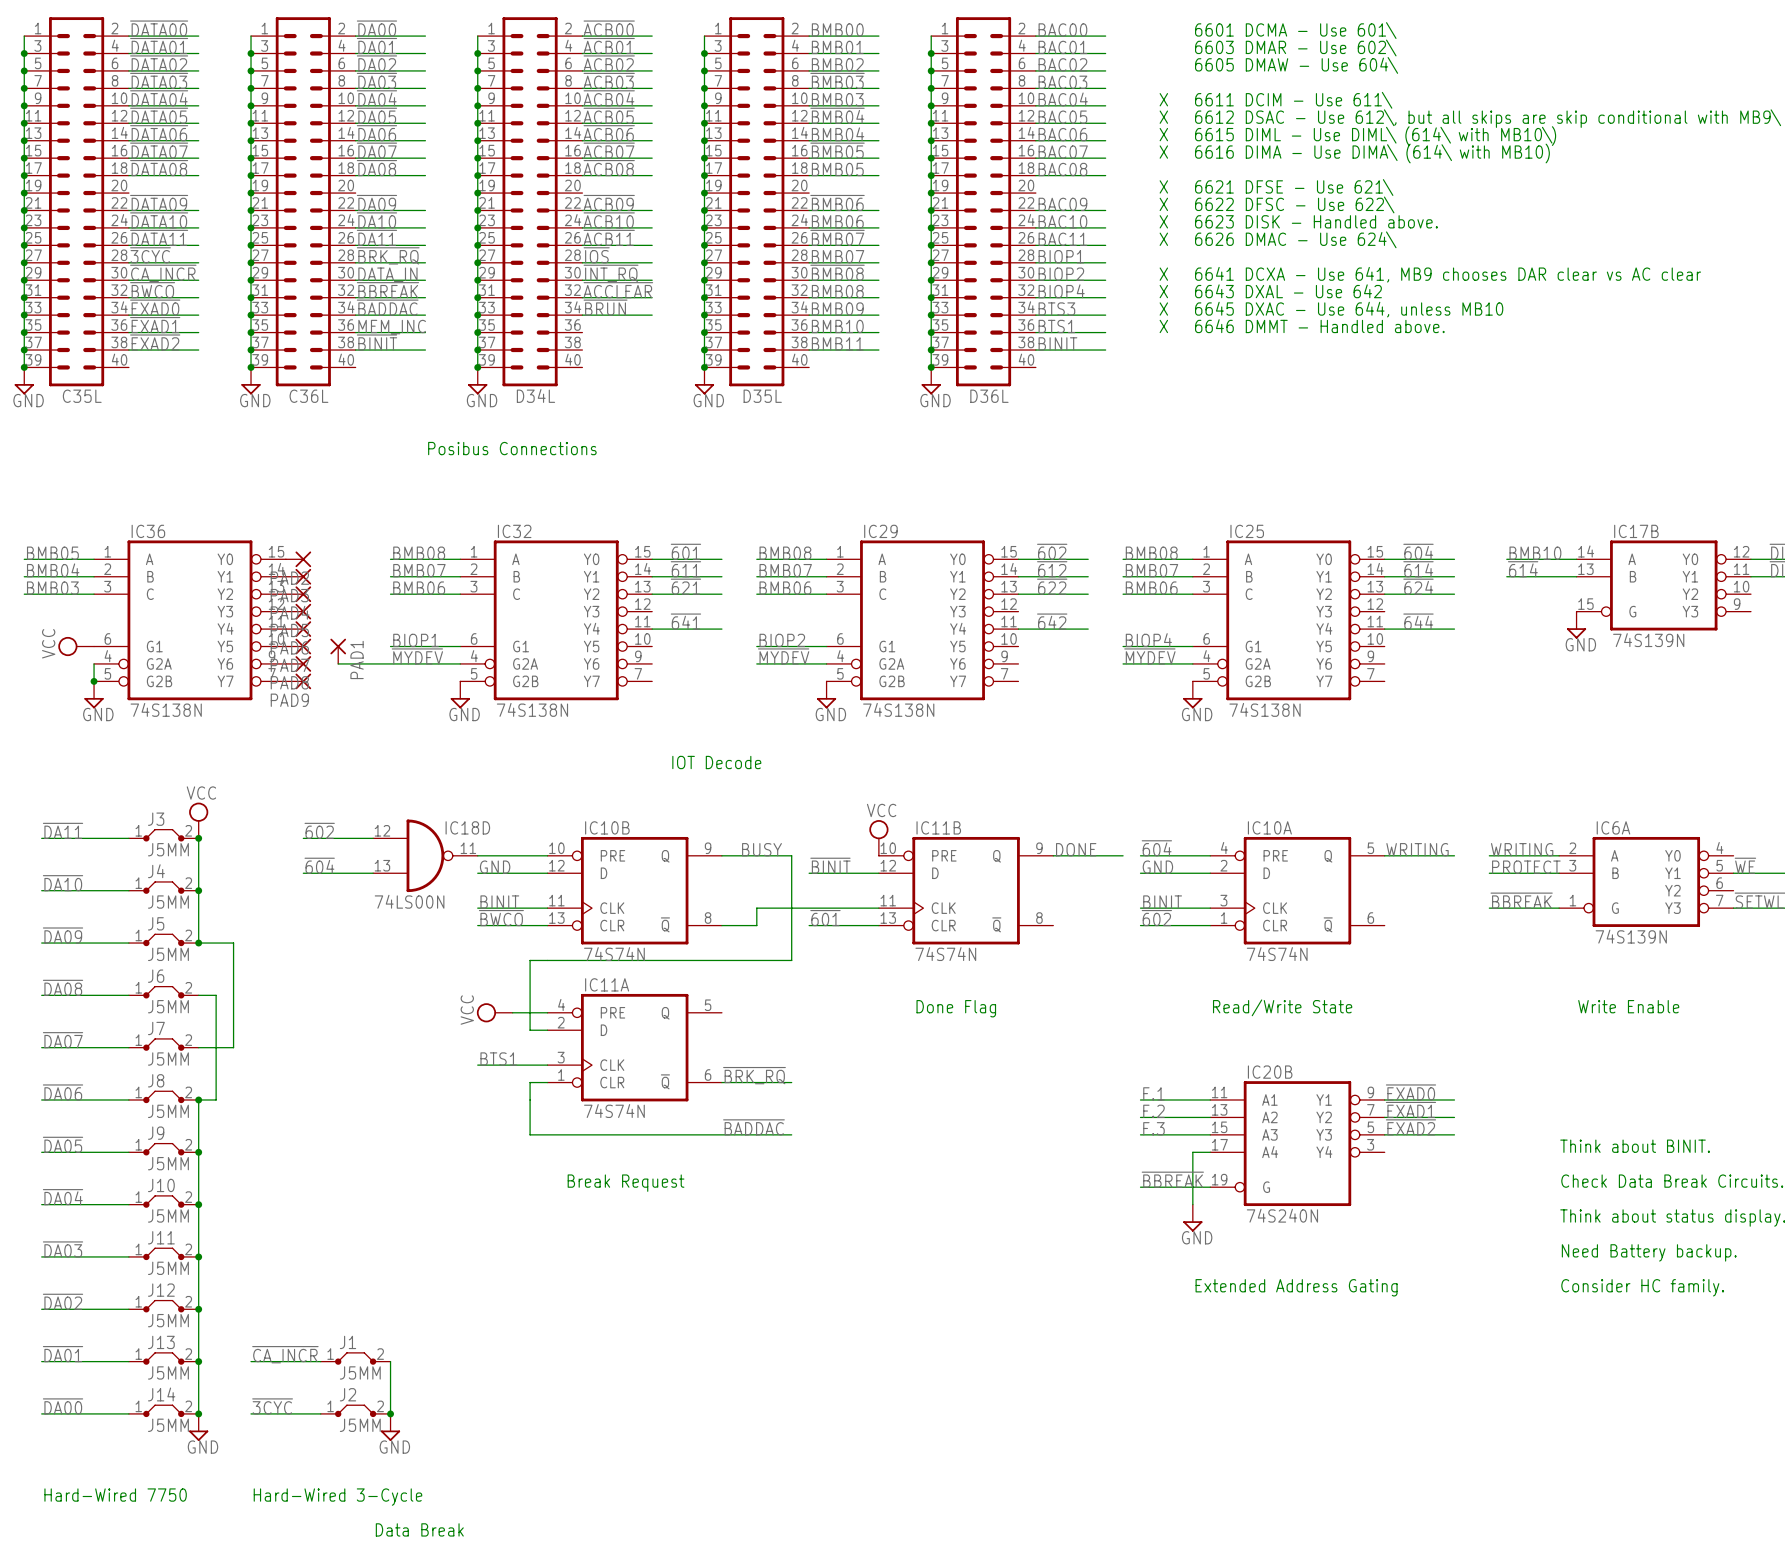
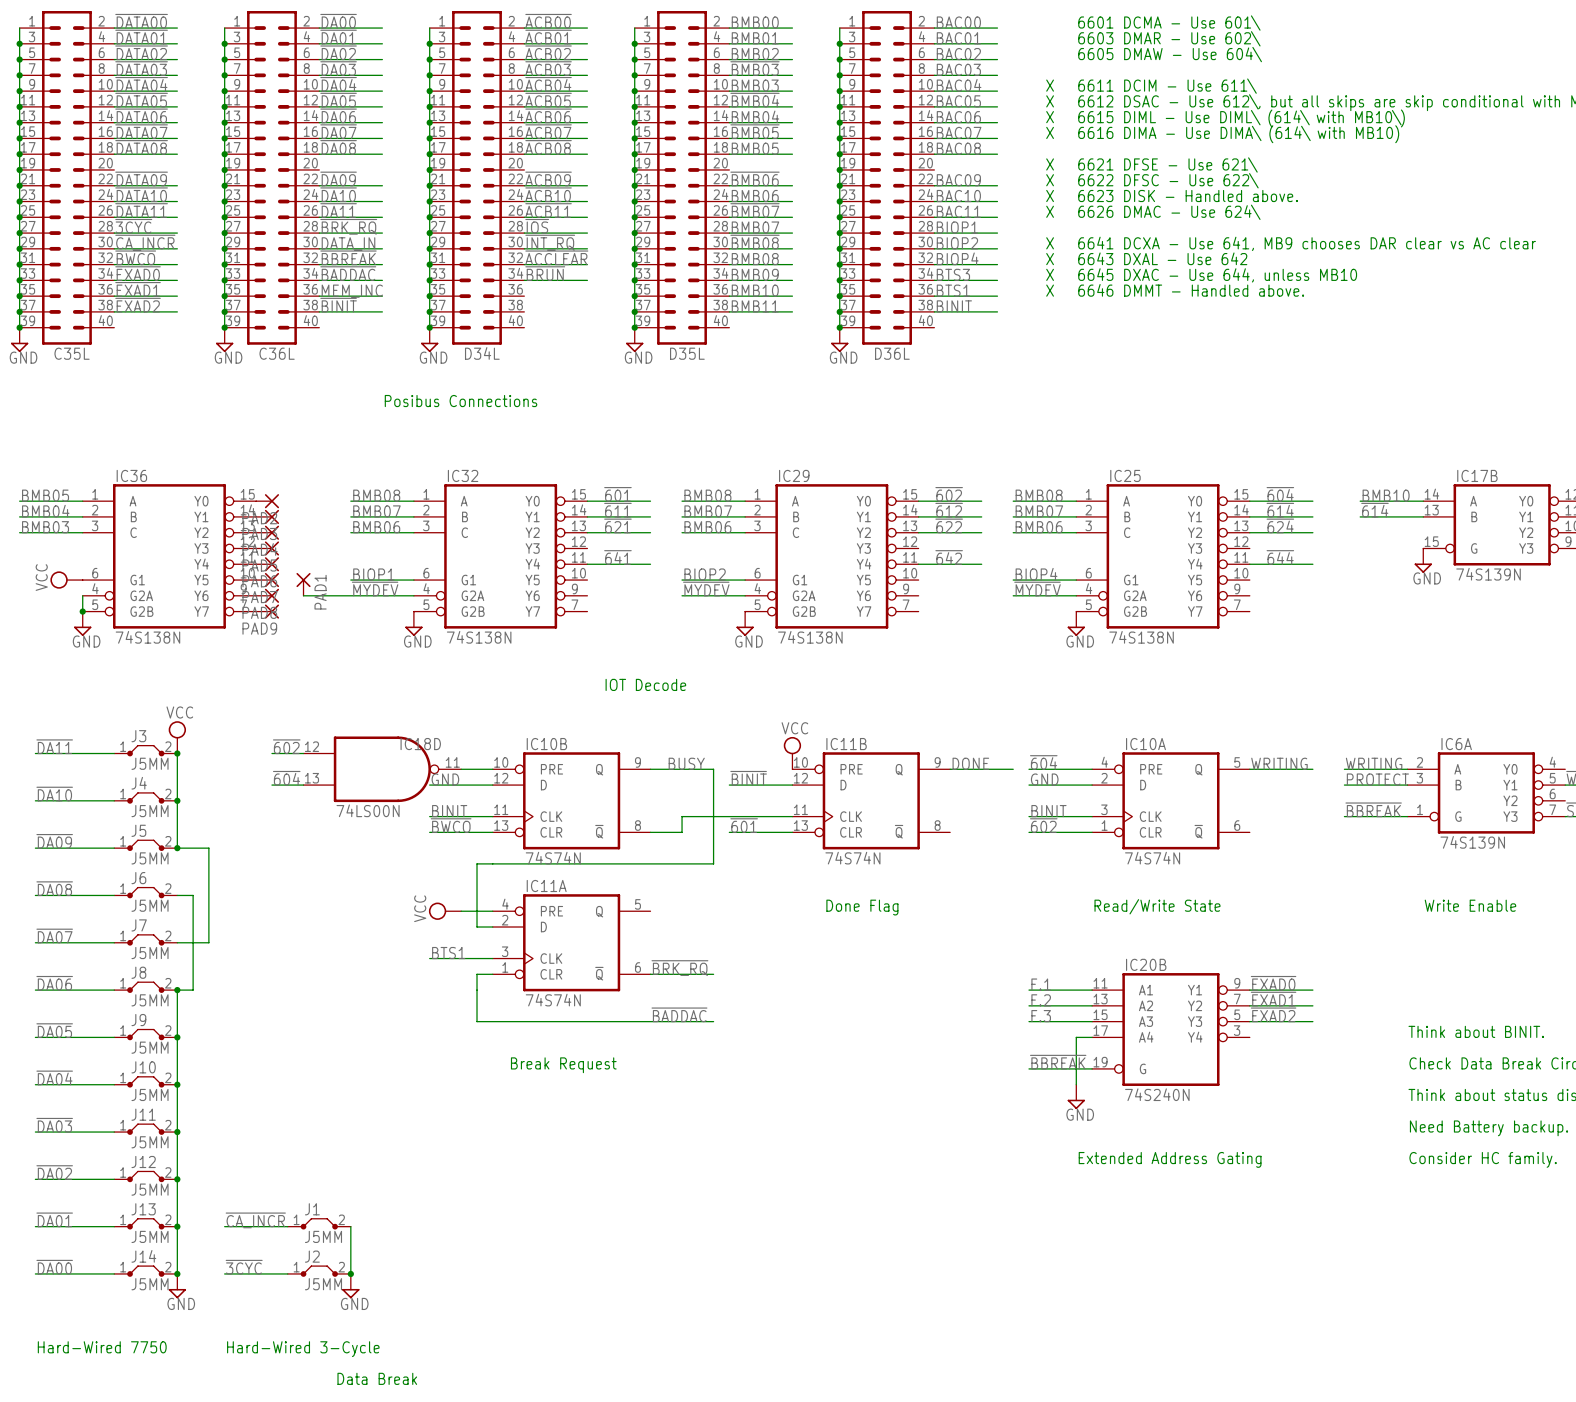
IC18D symbol: [373, 819, 478, 893] -> [303, 736, 462, 803]

